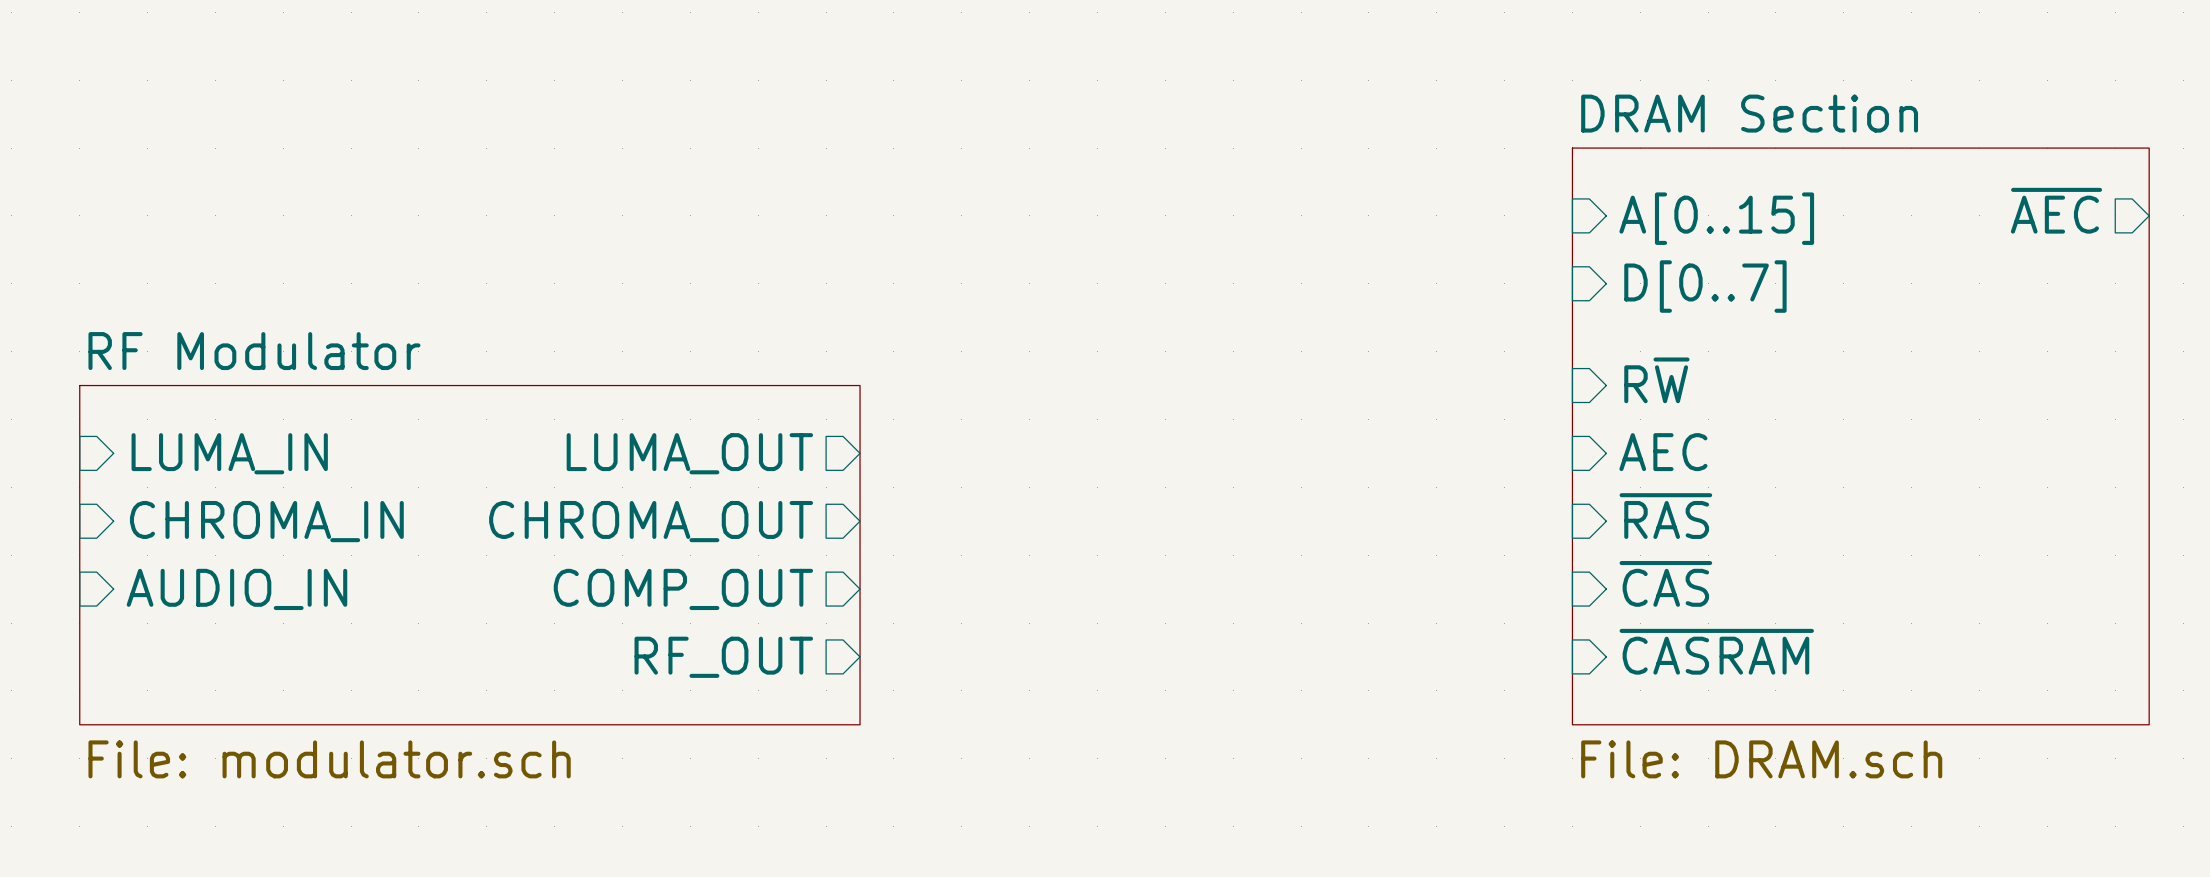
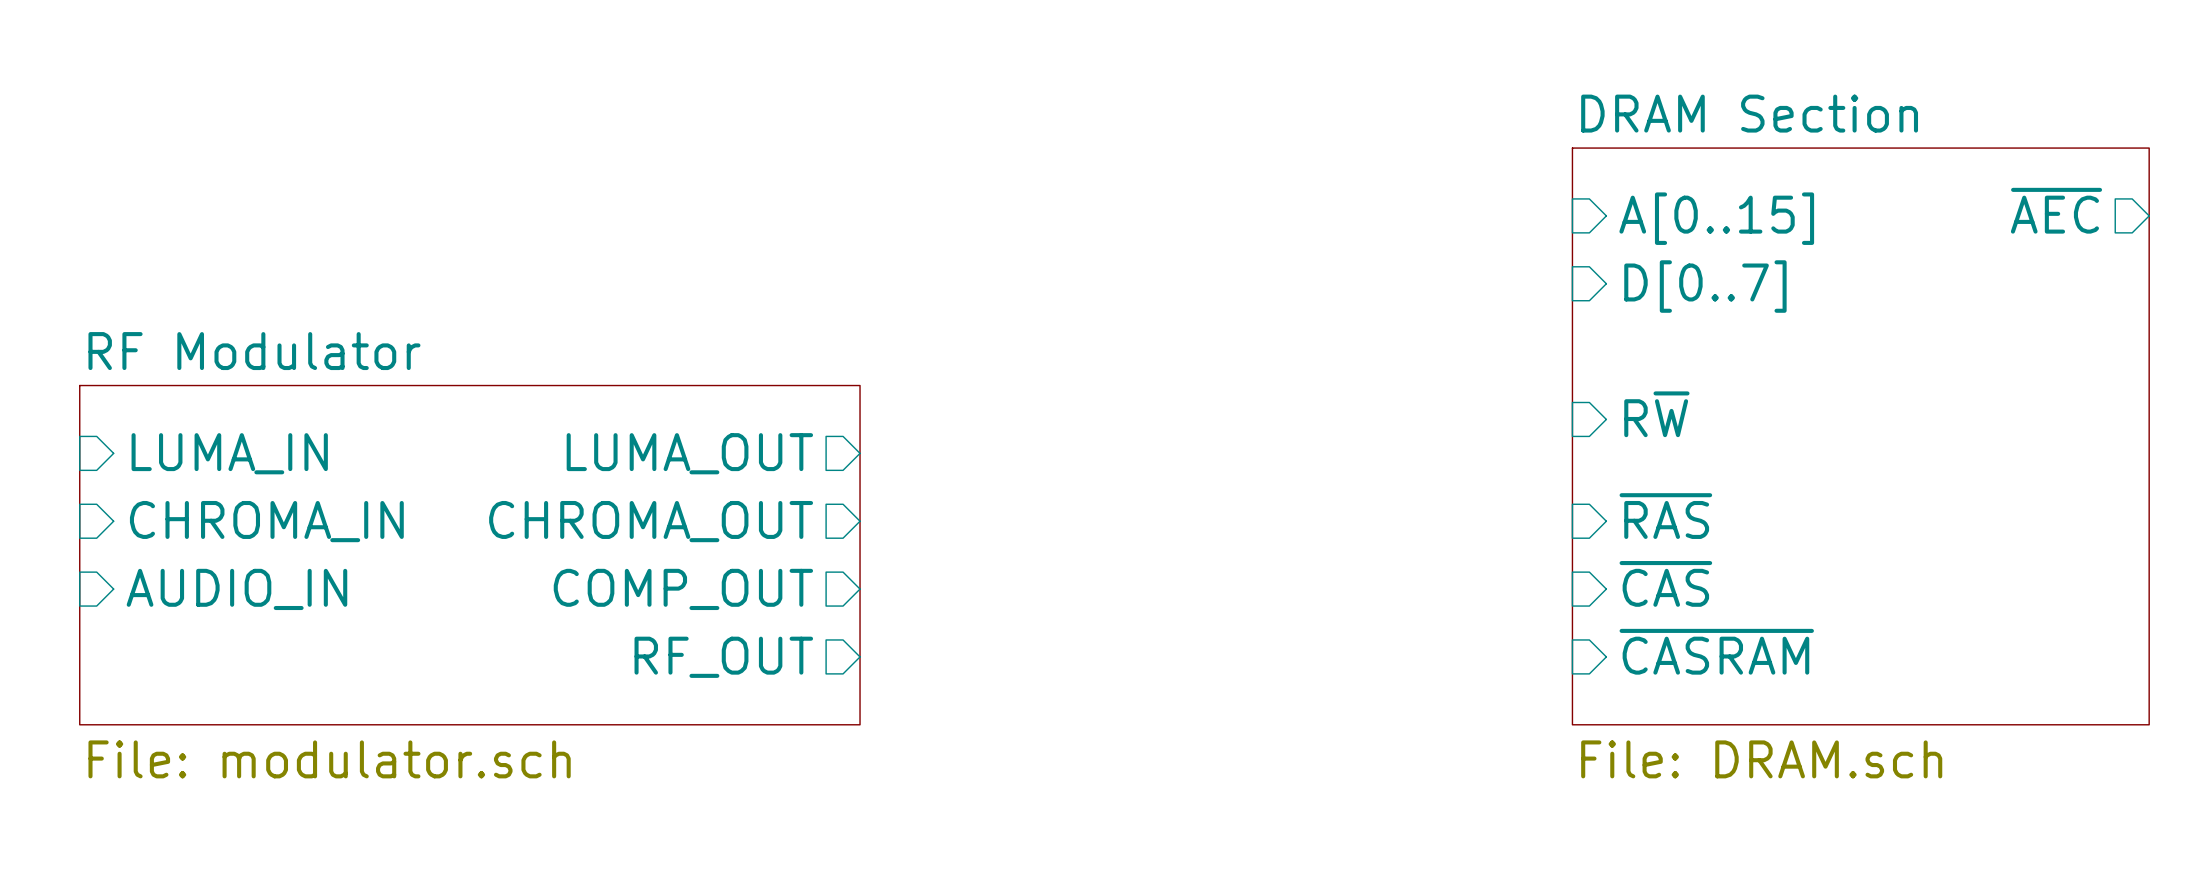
sheet pin position: R~{W} (1656, 380) -> R~{W} (1656, 414)
sheet pin: AEC (1663, 452) -> none

